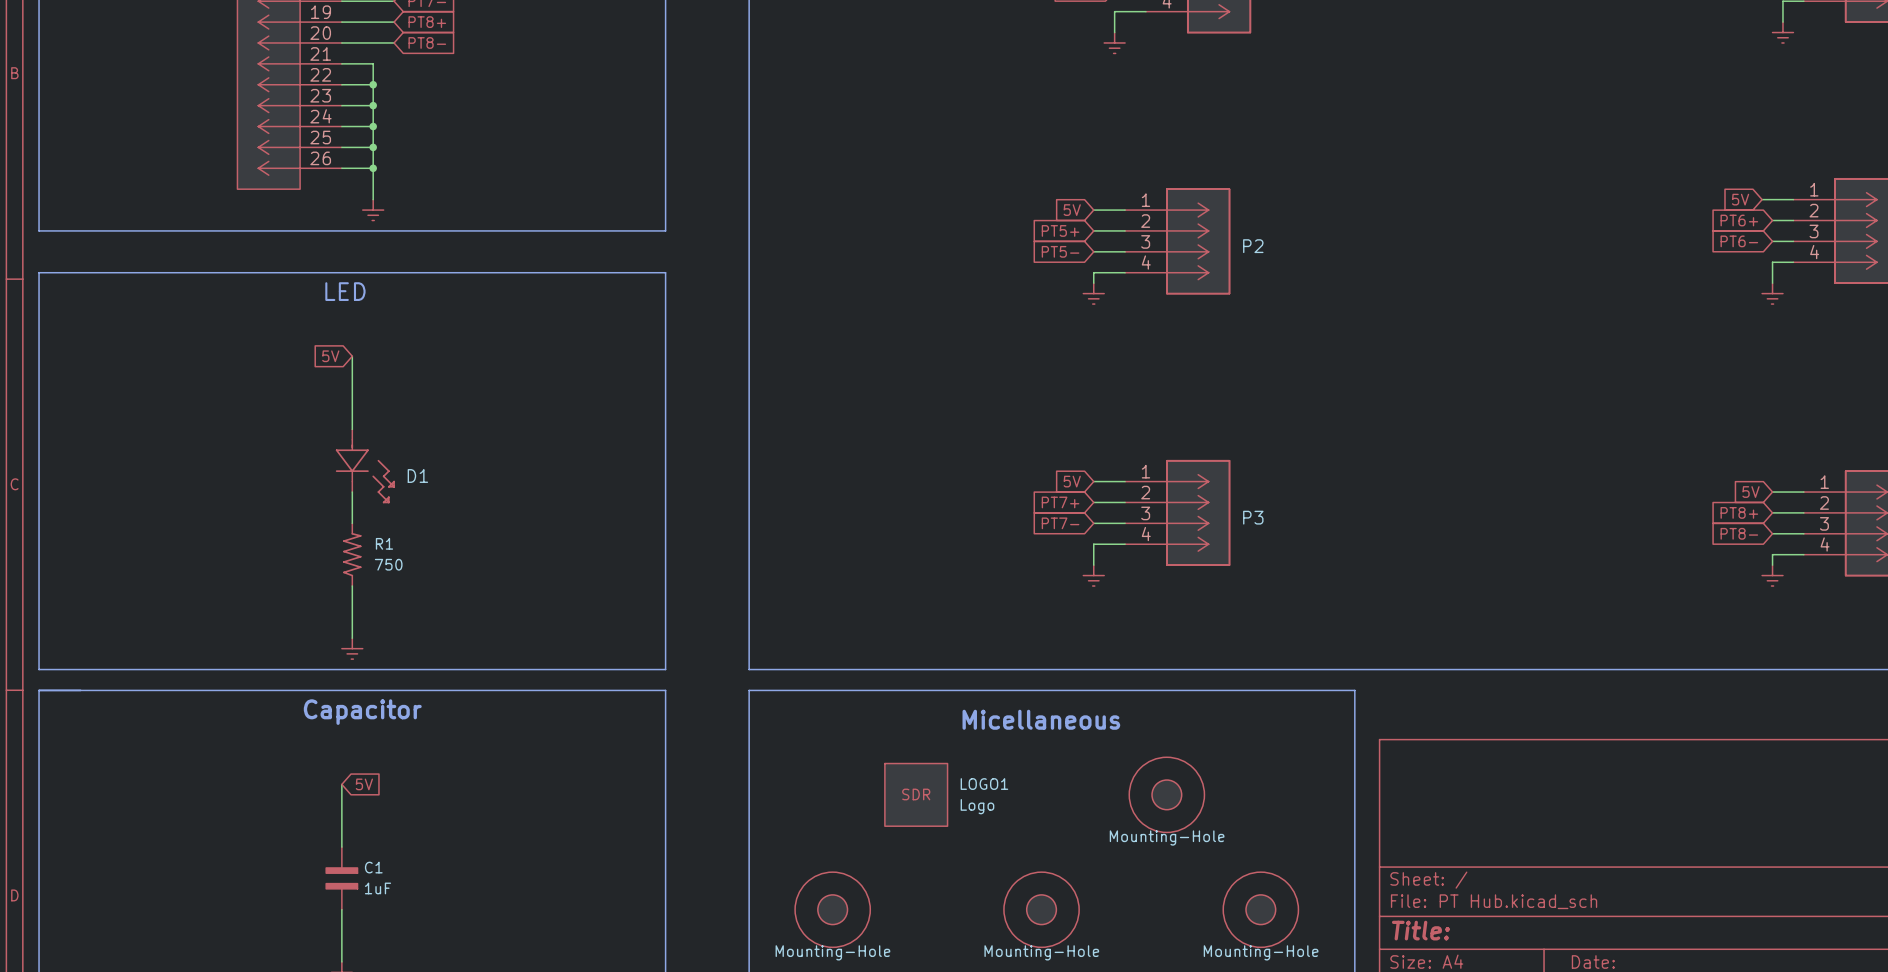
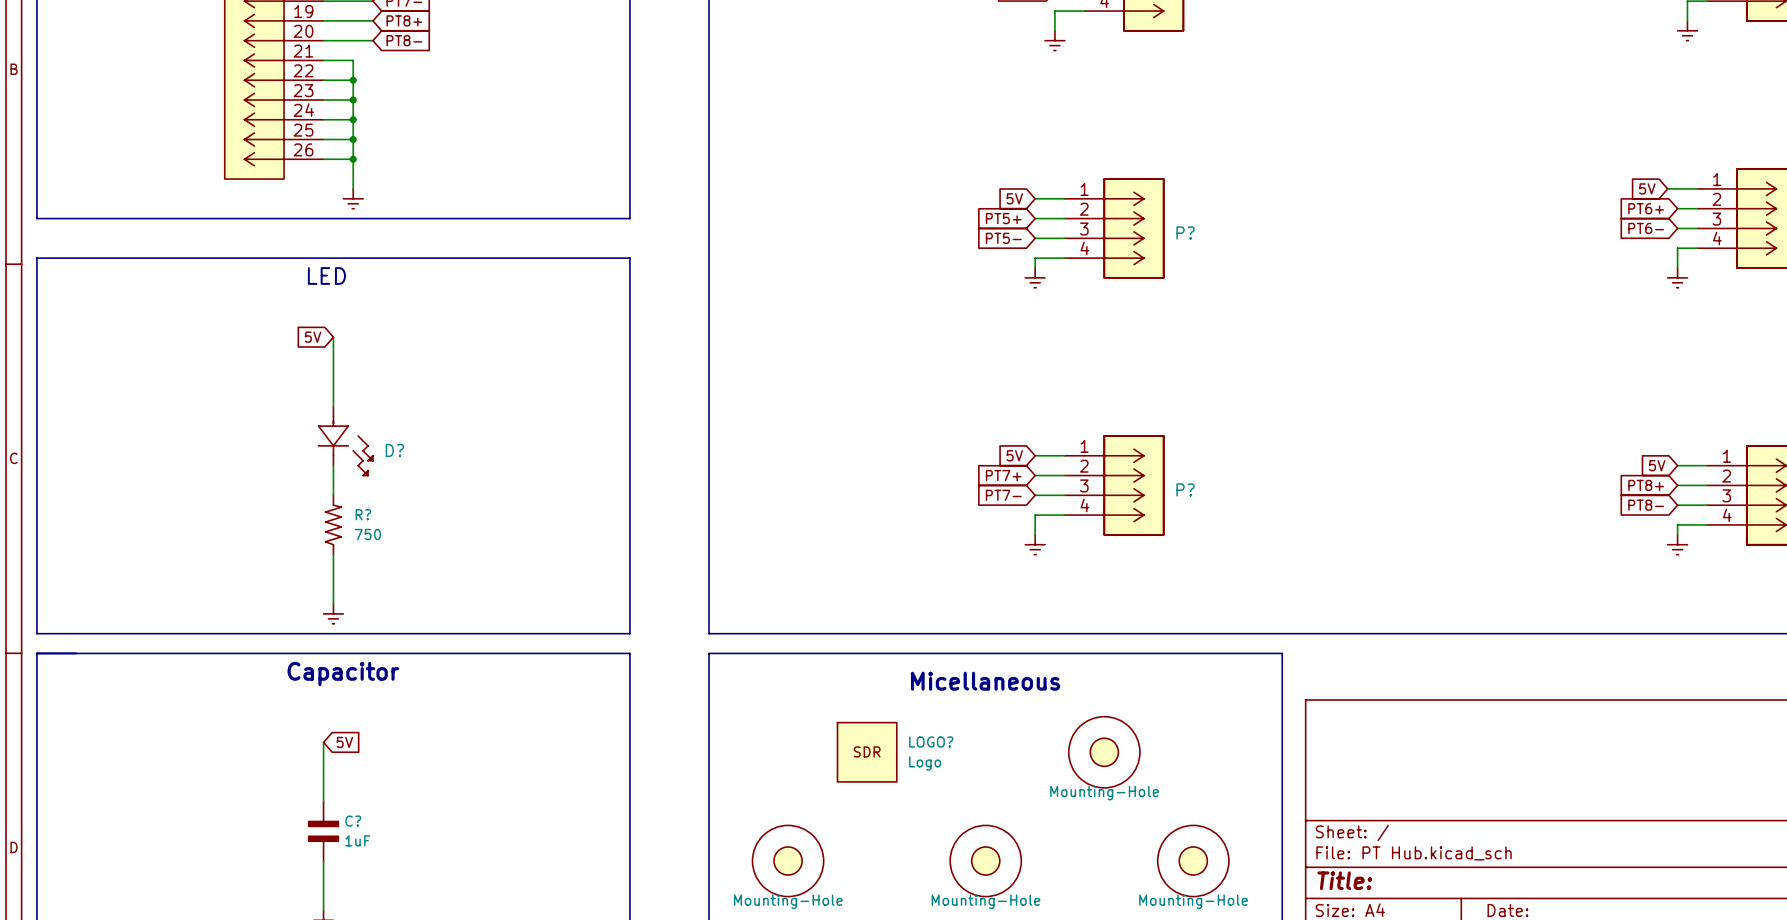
P2 name: P2 (1253, 246) -> P? (1185, 232)
D1 name: D1 (417, 475) -> D? (394, 450)
P3 name: P3 (1253, 517) -> P? (1185, 489)
R1 name: R1 (384, 543) -> R? (363, 514)
LOGO1 name: LOGO1 (984, 784) -> LOGO? (931, 742)
C1 name: C1 (373, 867) -> C? (353, 821)

